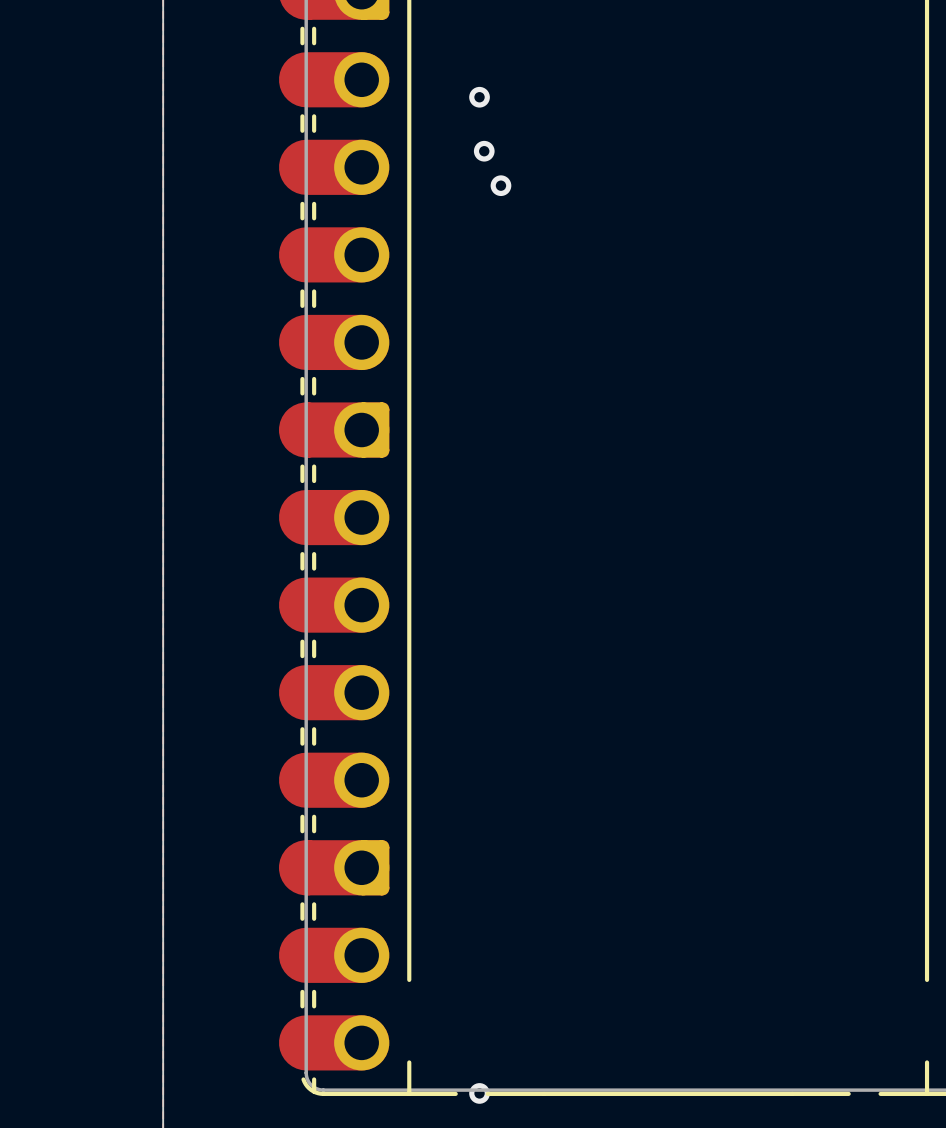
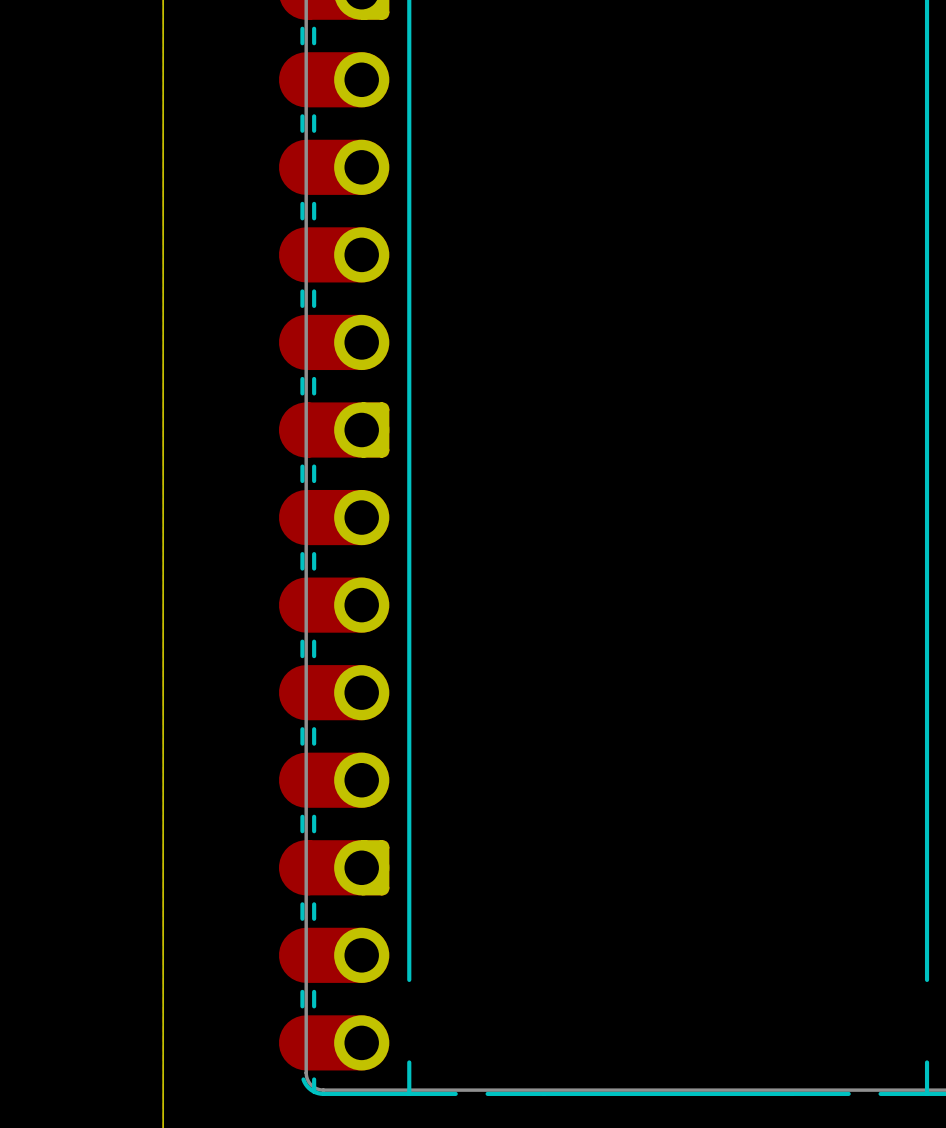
via: (479, 97) -> none
via: (484, 151) -> none
via: (500, 185) -> none
via: (479, 1093) -> none

